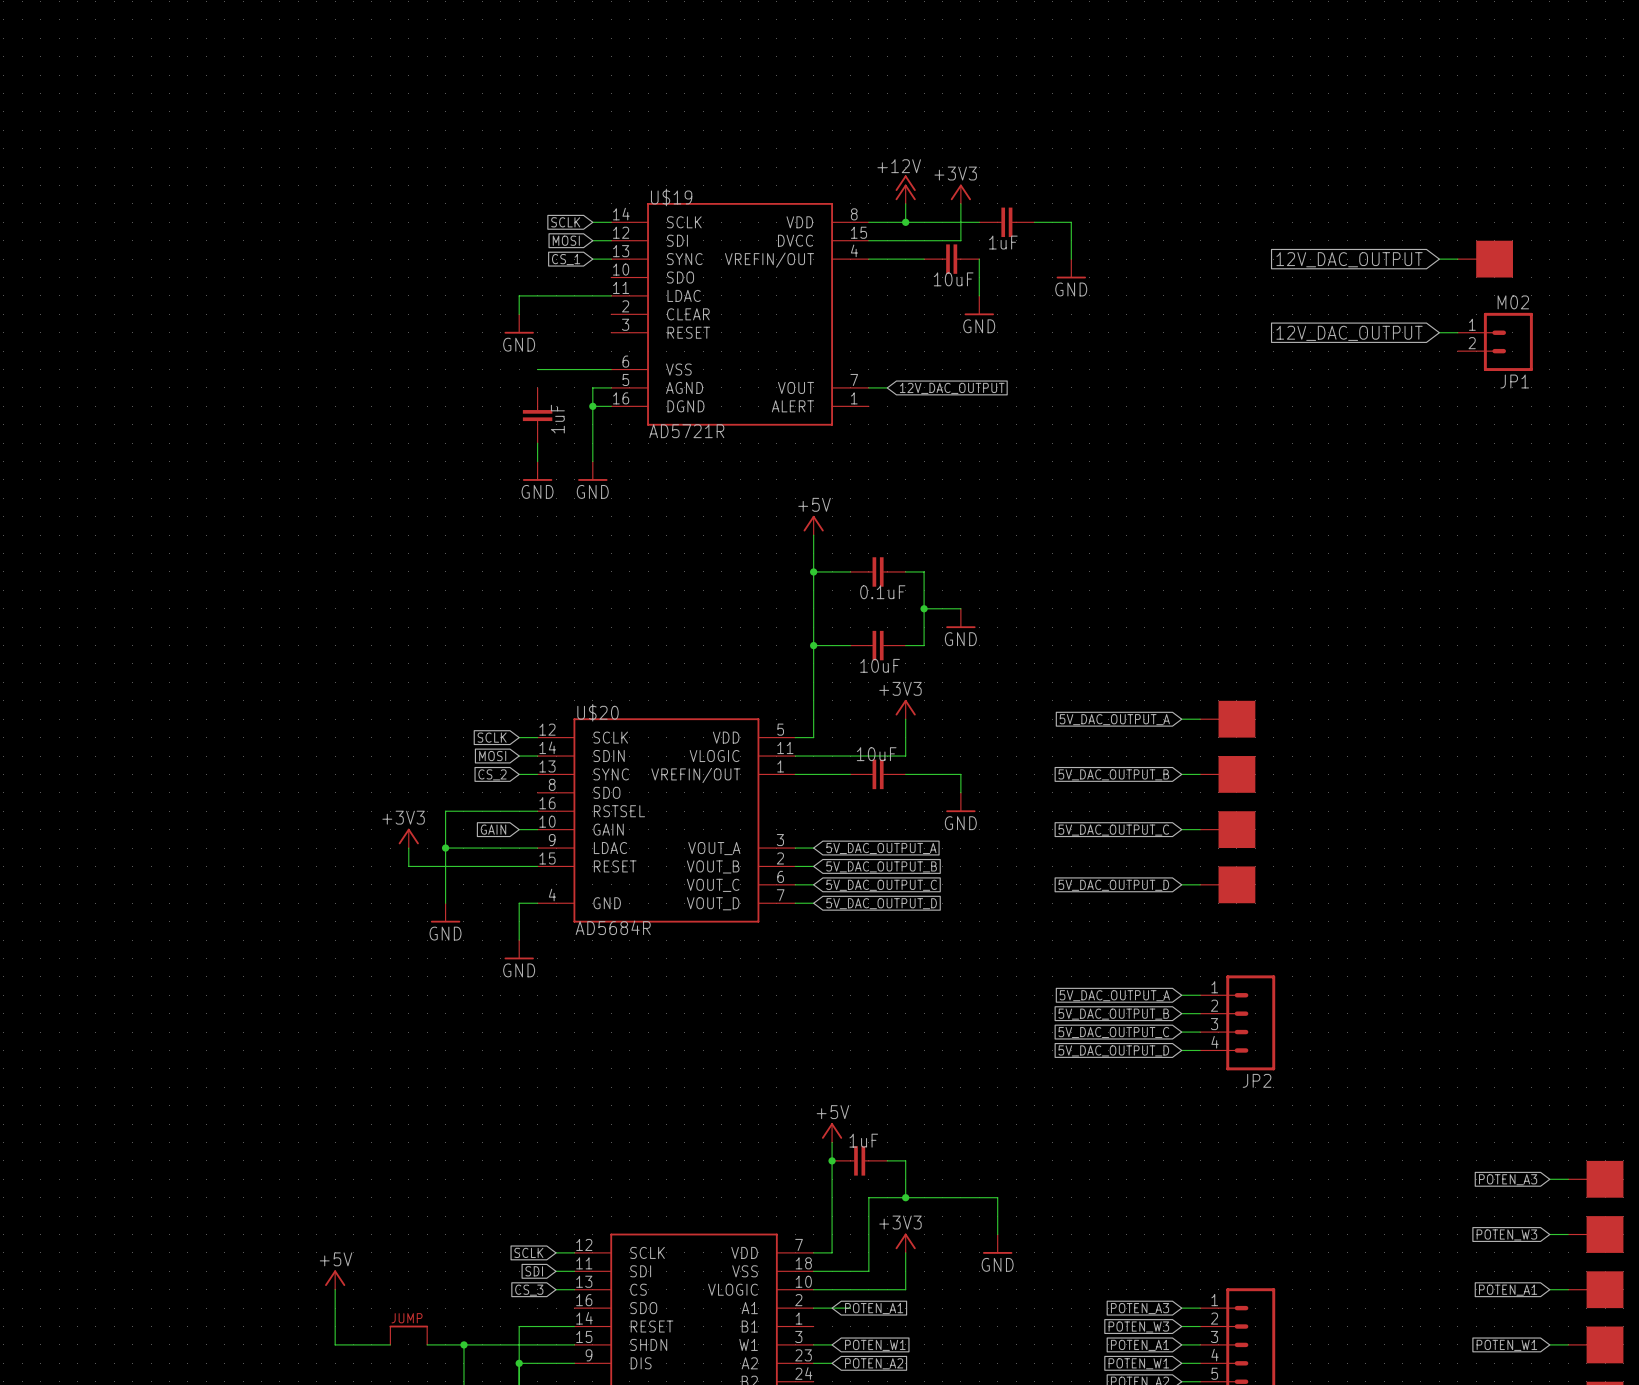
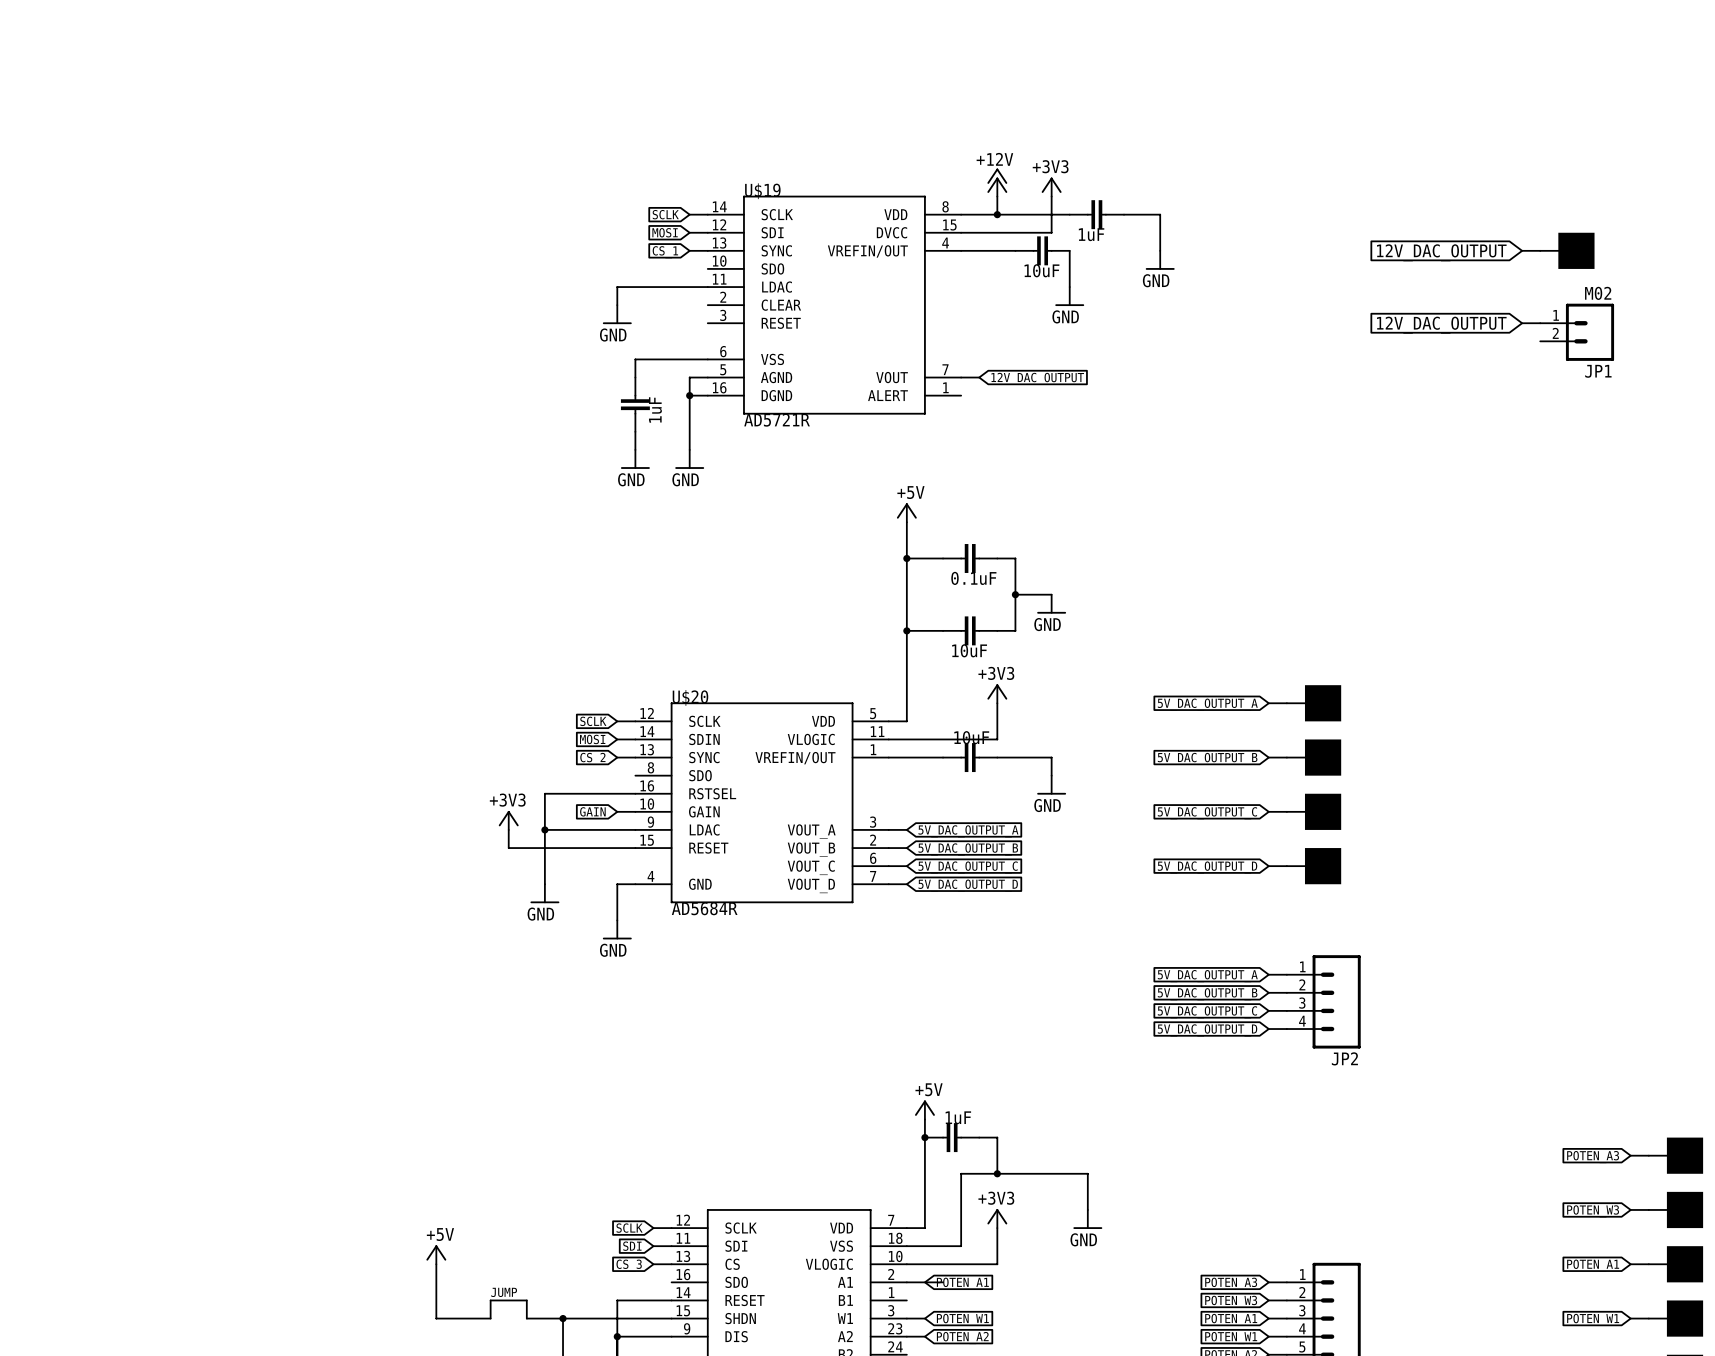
wire: none -> (635, 359) (635, 377)

